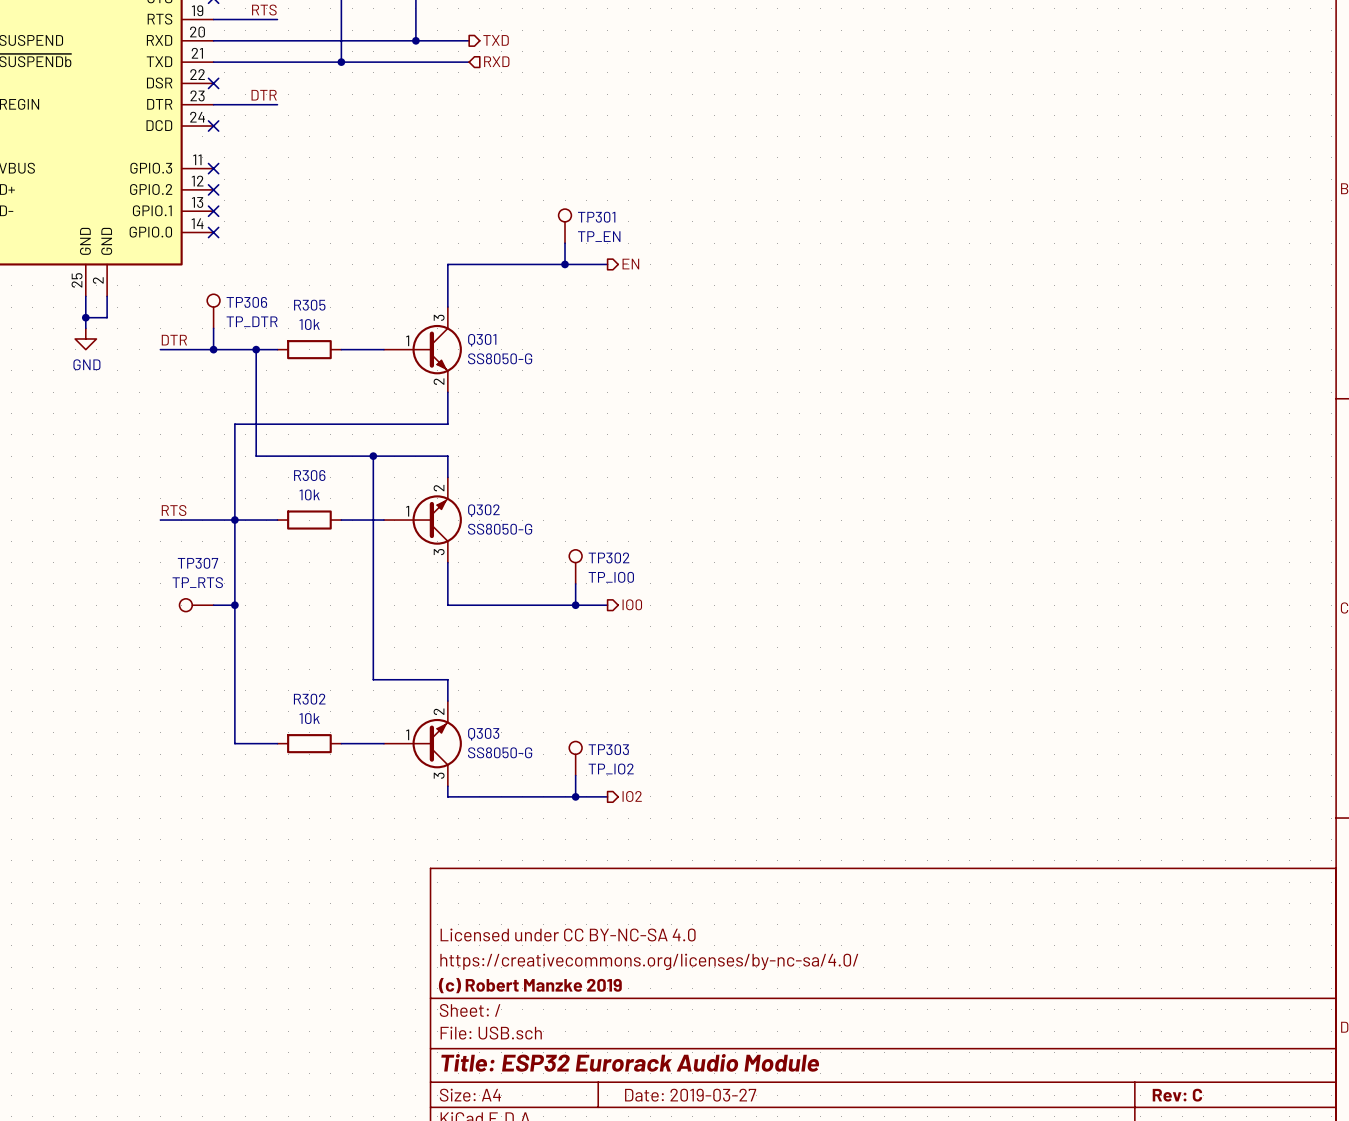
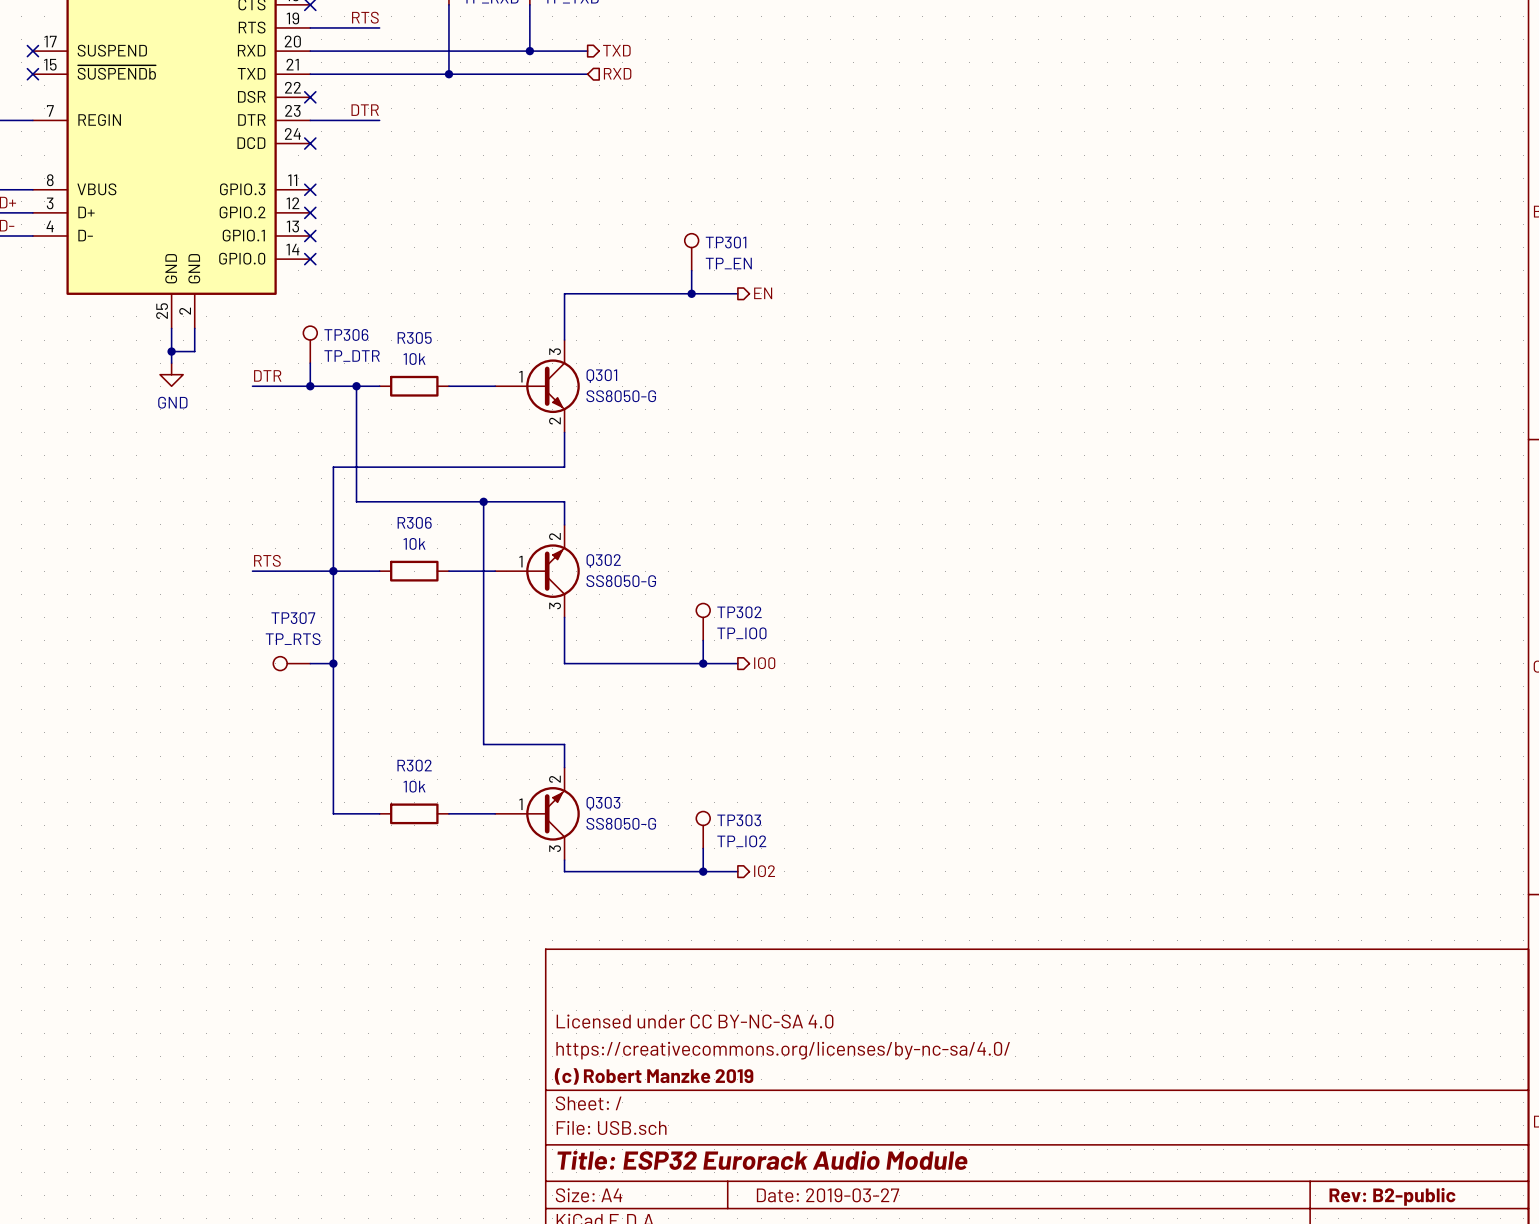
title block: Rev: C (1177, 1095) -> Rev: B2-public (1392, 1196)

